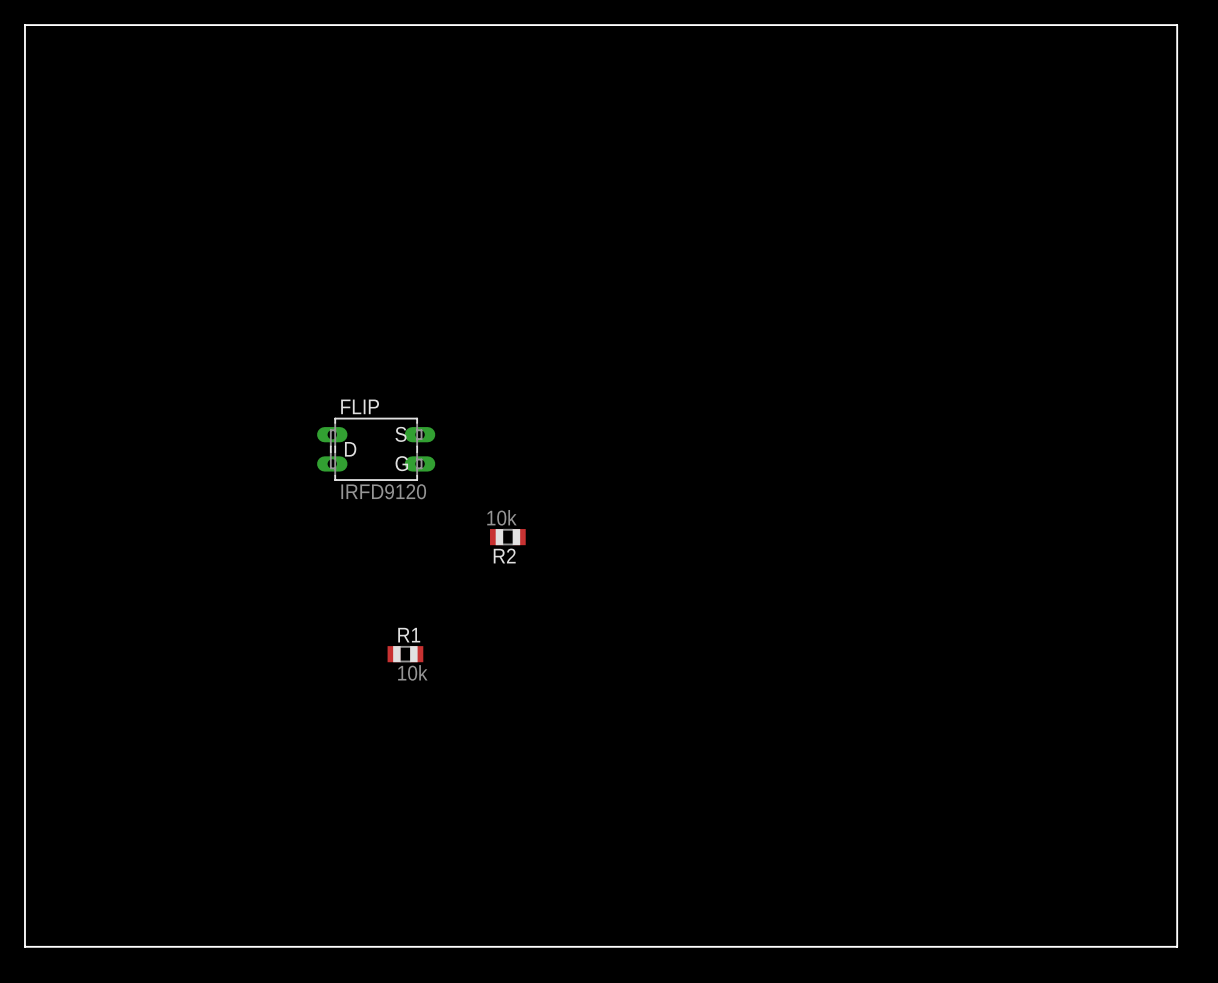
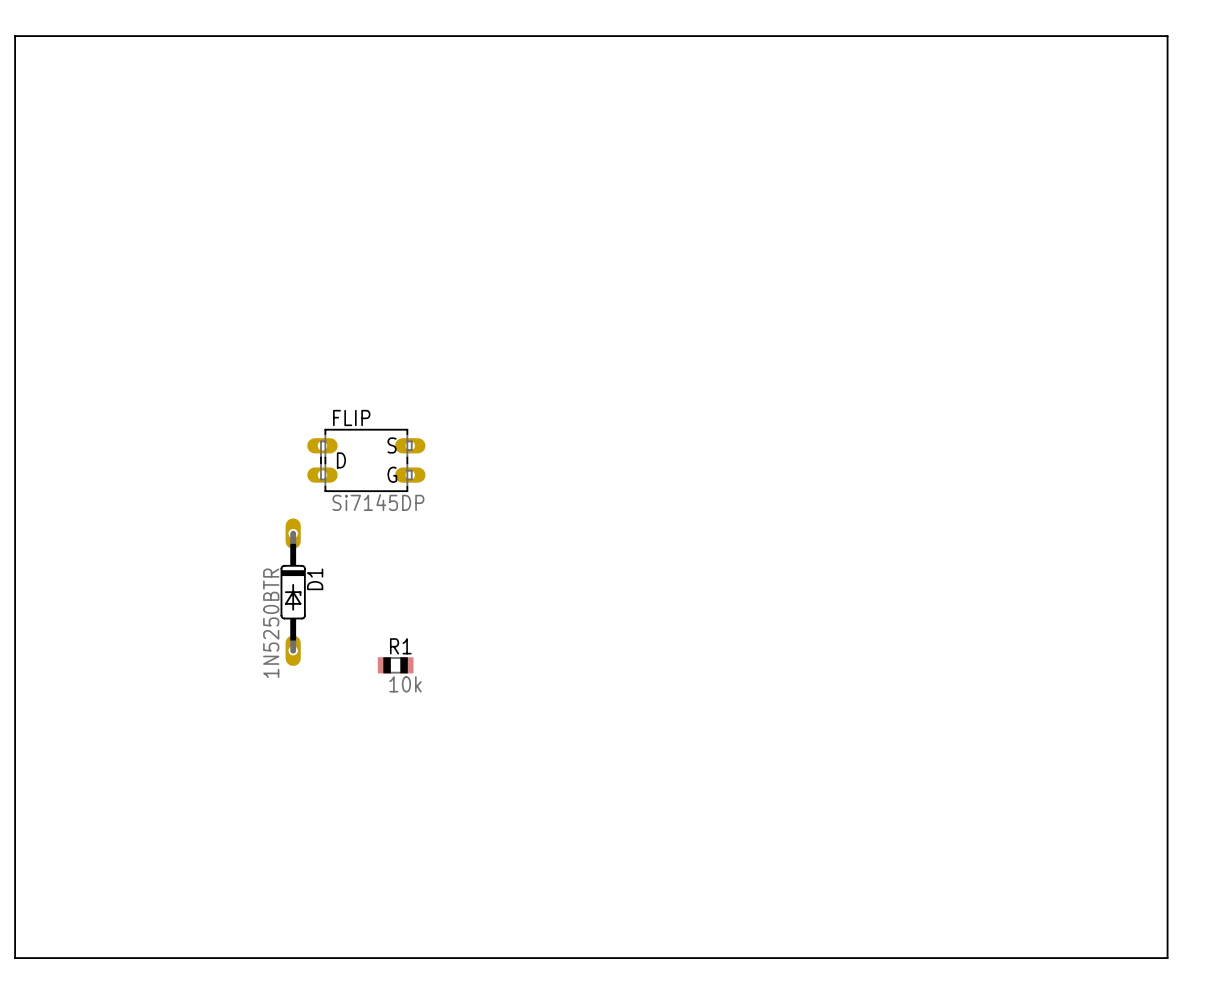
FLIP value: IRFD9120 (383, 491) -> Si7145DP (378, 502)
R2: 10k (507, 537) -> none
D1: none -> 1N5250BTR (293, 592)

